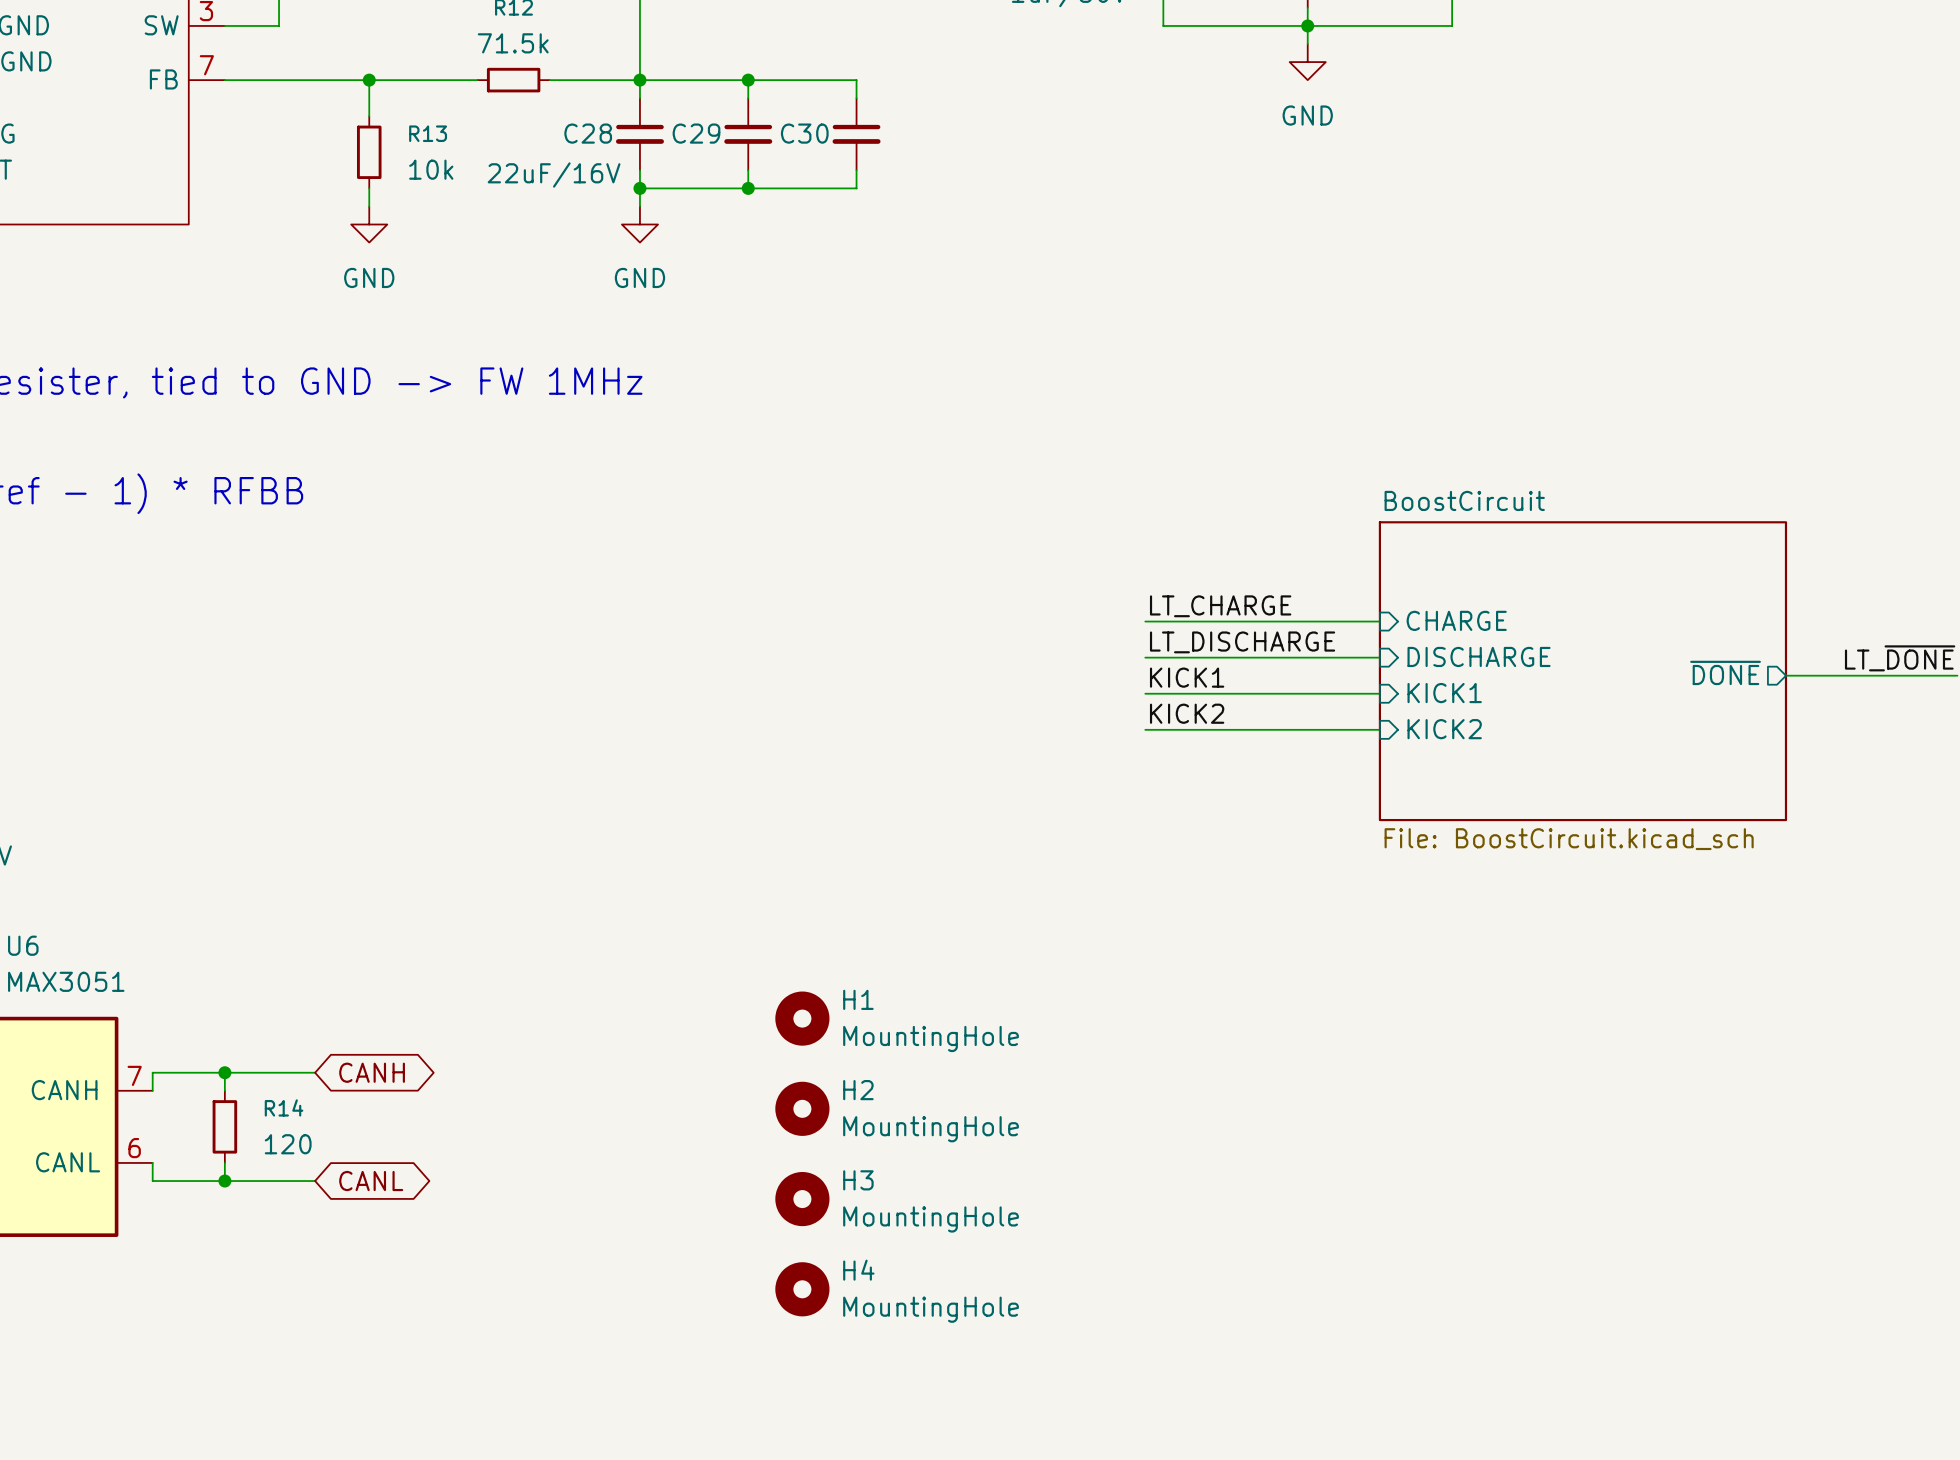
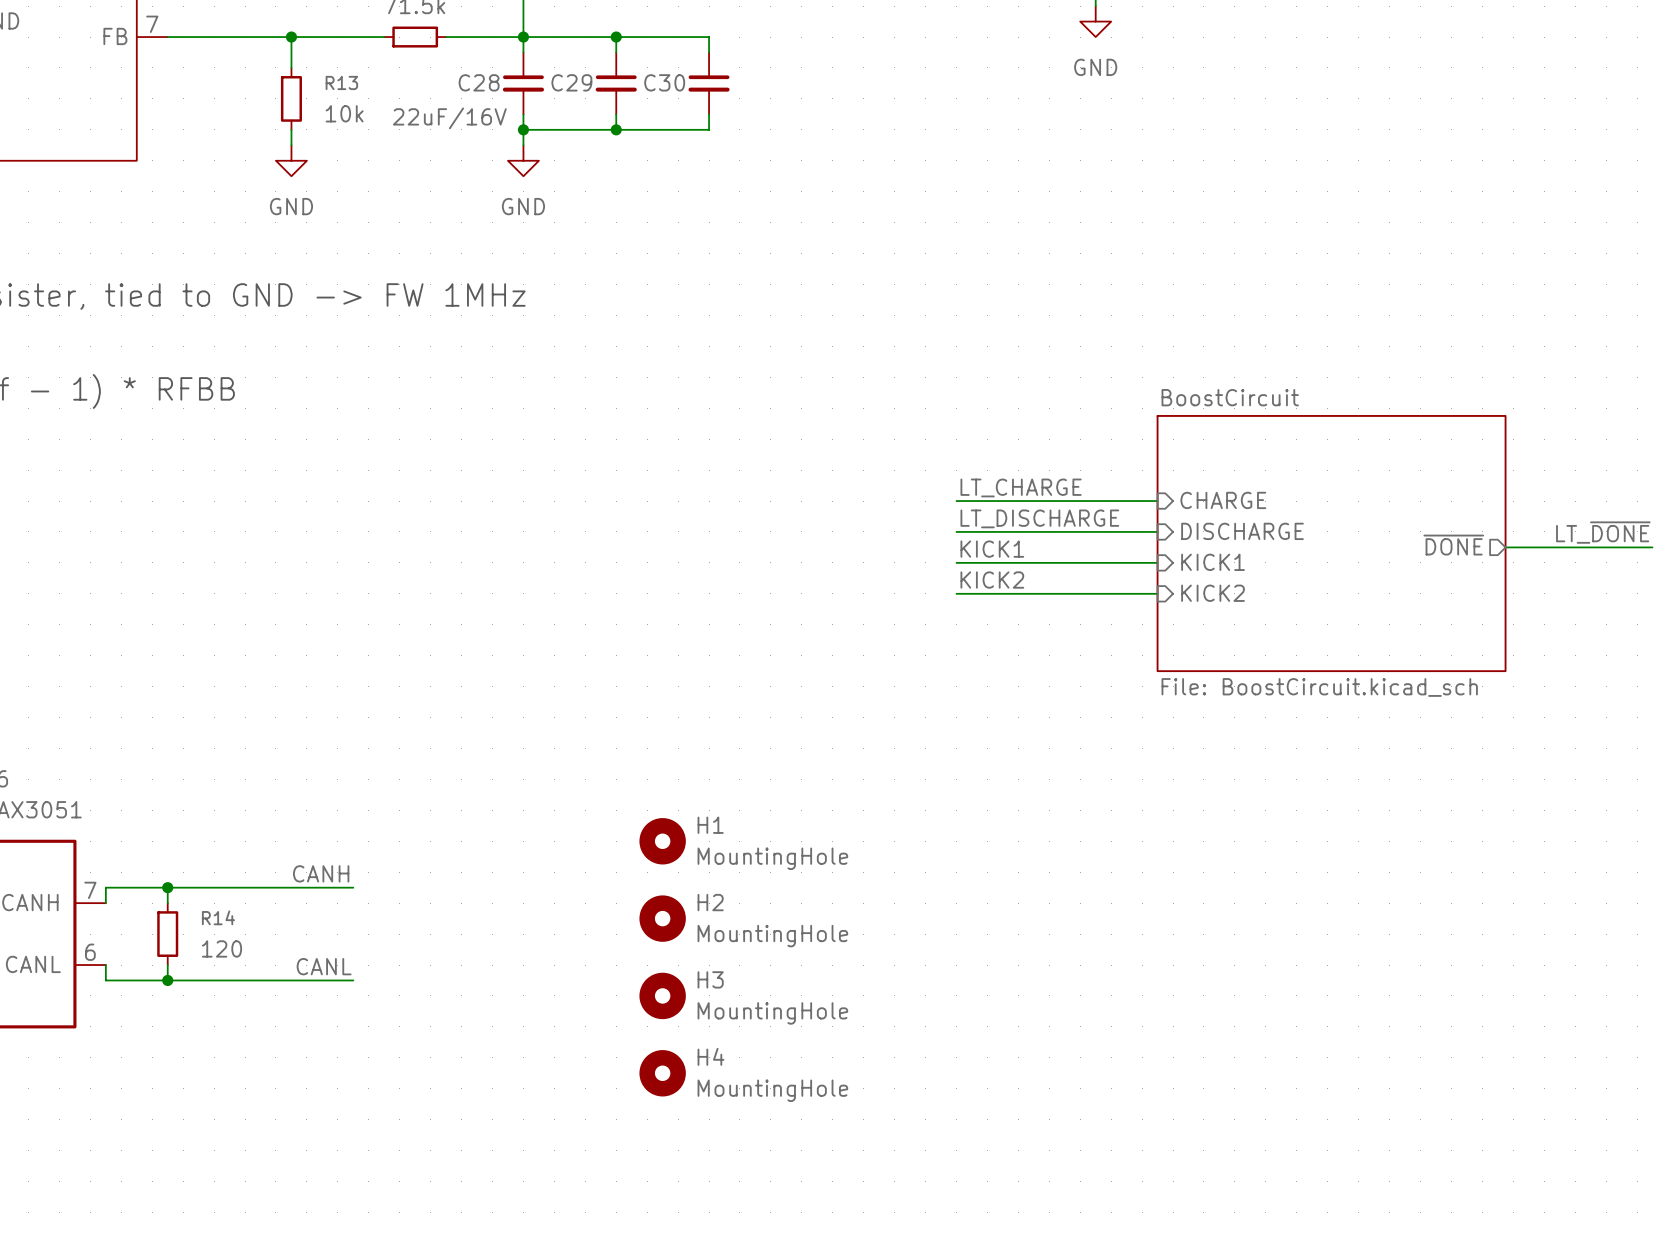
label: none -> CANH (321, 873)
wire: none -> (245, 887) (353, 887)
global label: CANH (372, 1072) -> none
label: none -> CANL (324, 966)
wire: none -> (245, 980) (353, 980)
global label: CANL (371, 1181) -> none

